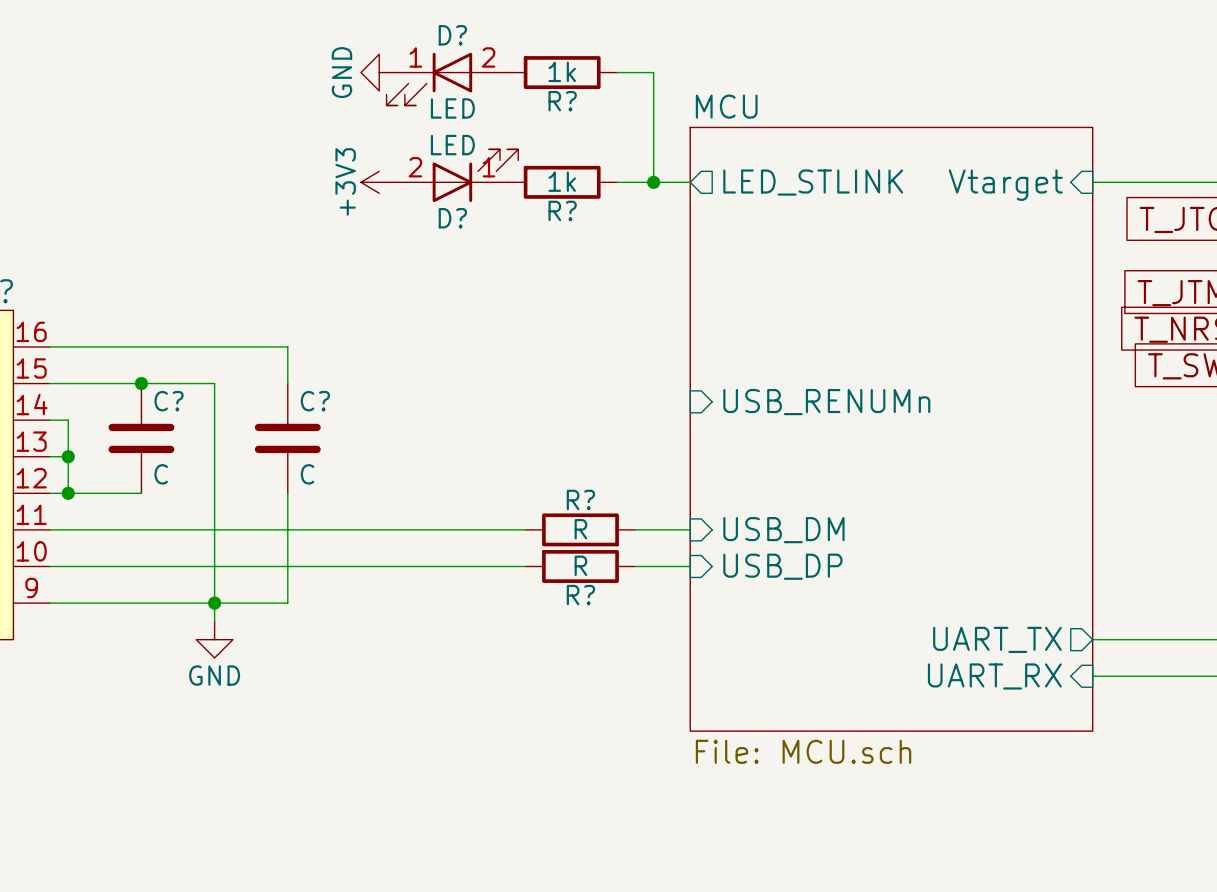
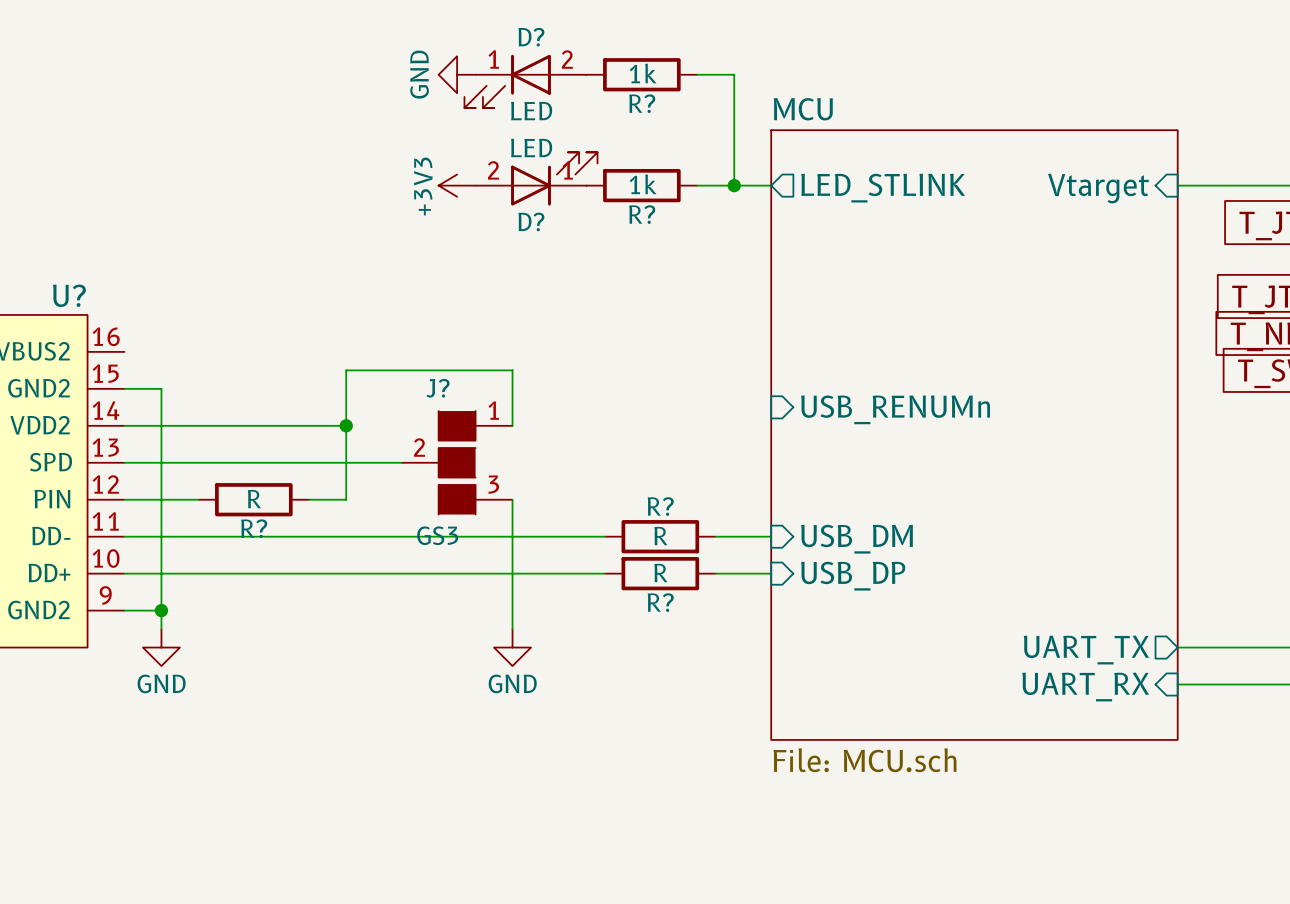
wire: (49, 346) (287, 346) (287, 383) -> none
wire: (86, 383) (214, 383) (214, 621) -> (161, 388) (161, 629)
junction: (141, 383) -> none
wire: (68, 420) (68, 493) -> (142, 425) (346, 425)
junction: none -> (346, 425)
wire: none -> (512, 425) (512, 370) (346, 370) (346, 499) (309, 499)
C?: C (141, 438) -> none
C?: C (287, 438) -> none
wire: none -> (142, 462) (401, 462)
junction: (68, 456) -> none
J?: none -> GS3 (457, 462)
junction: (68, 493) -> none
R?: none -> R (253, 499)
wire: (287, 493) (287, 603) (86, 603) -> none
wire: none -> (512, 499) (512, 629)
junction: none -> (161, 610)
junction: (214, 603) -> none
power symbol: none -> GND (161, 647)
power symbol: GND (214, 639) -> none
power symbol: none -> GND (512, 647)

